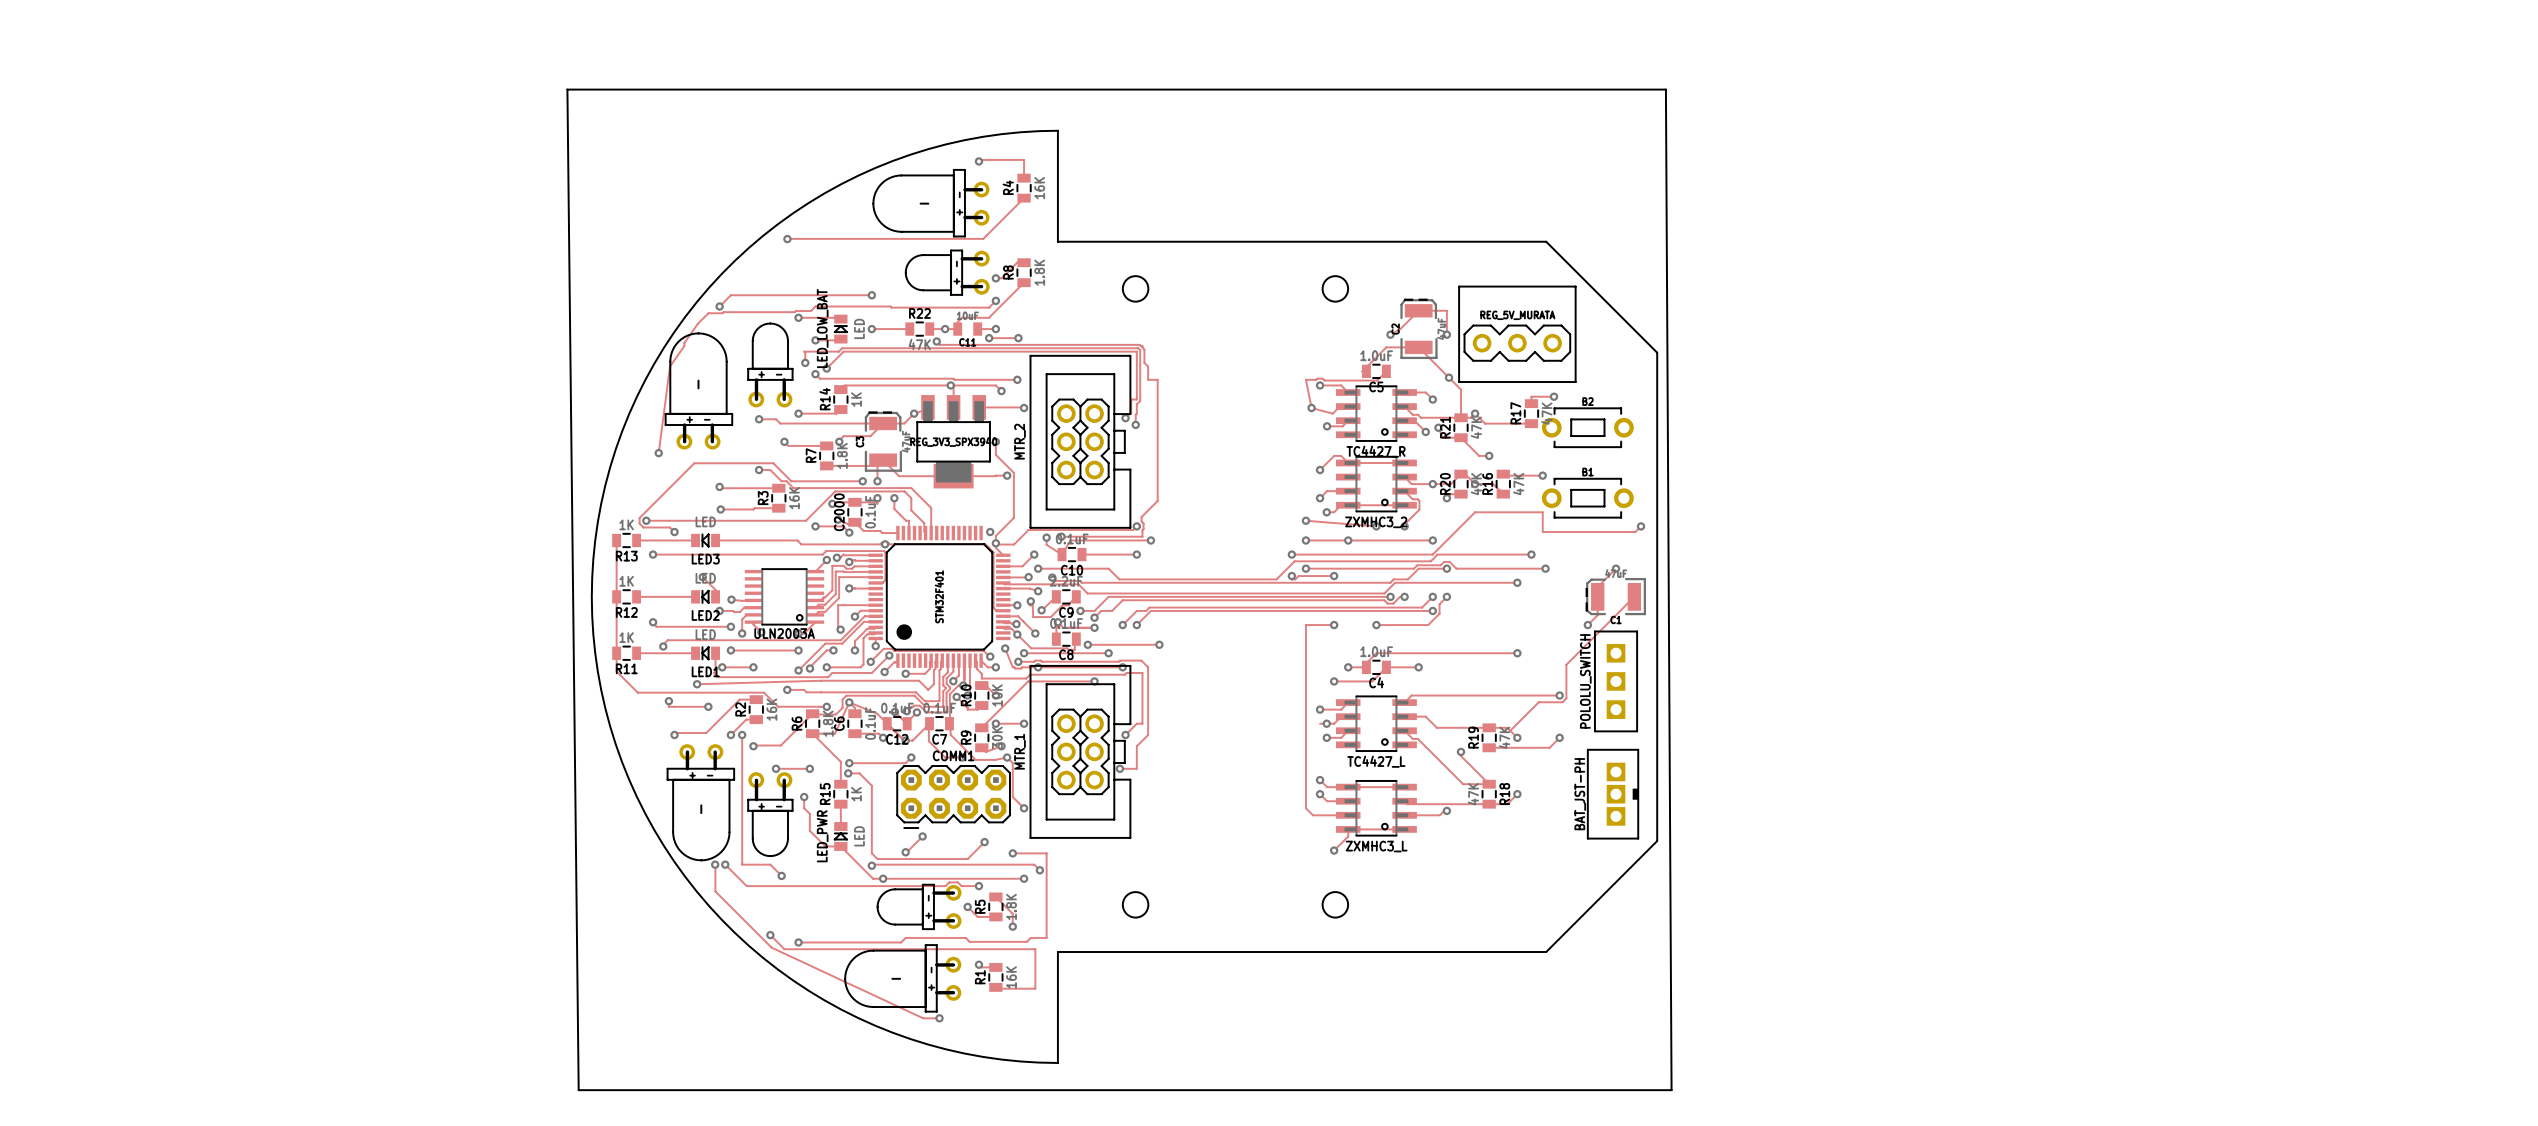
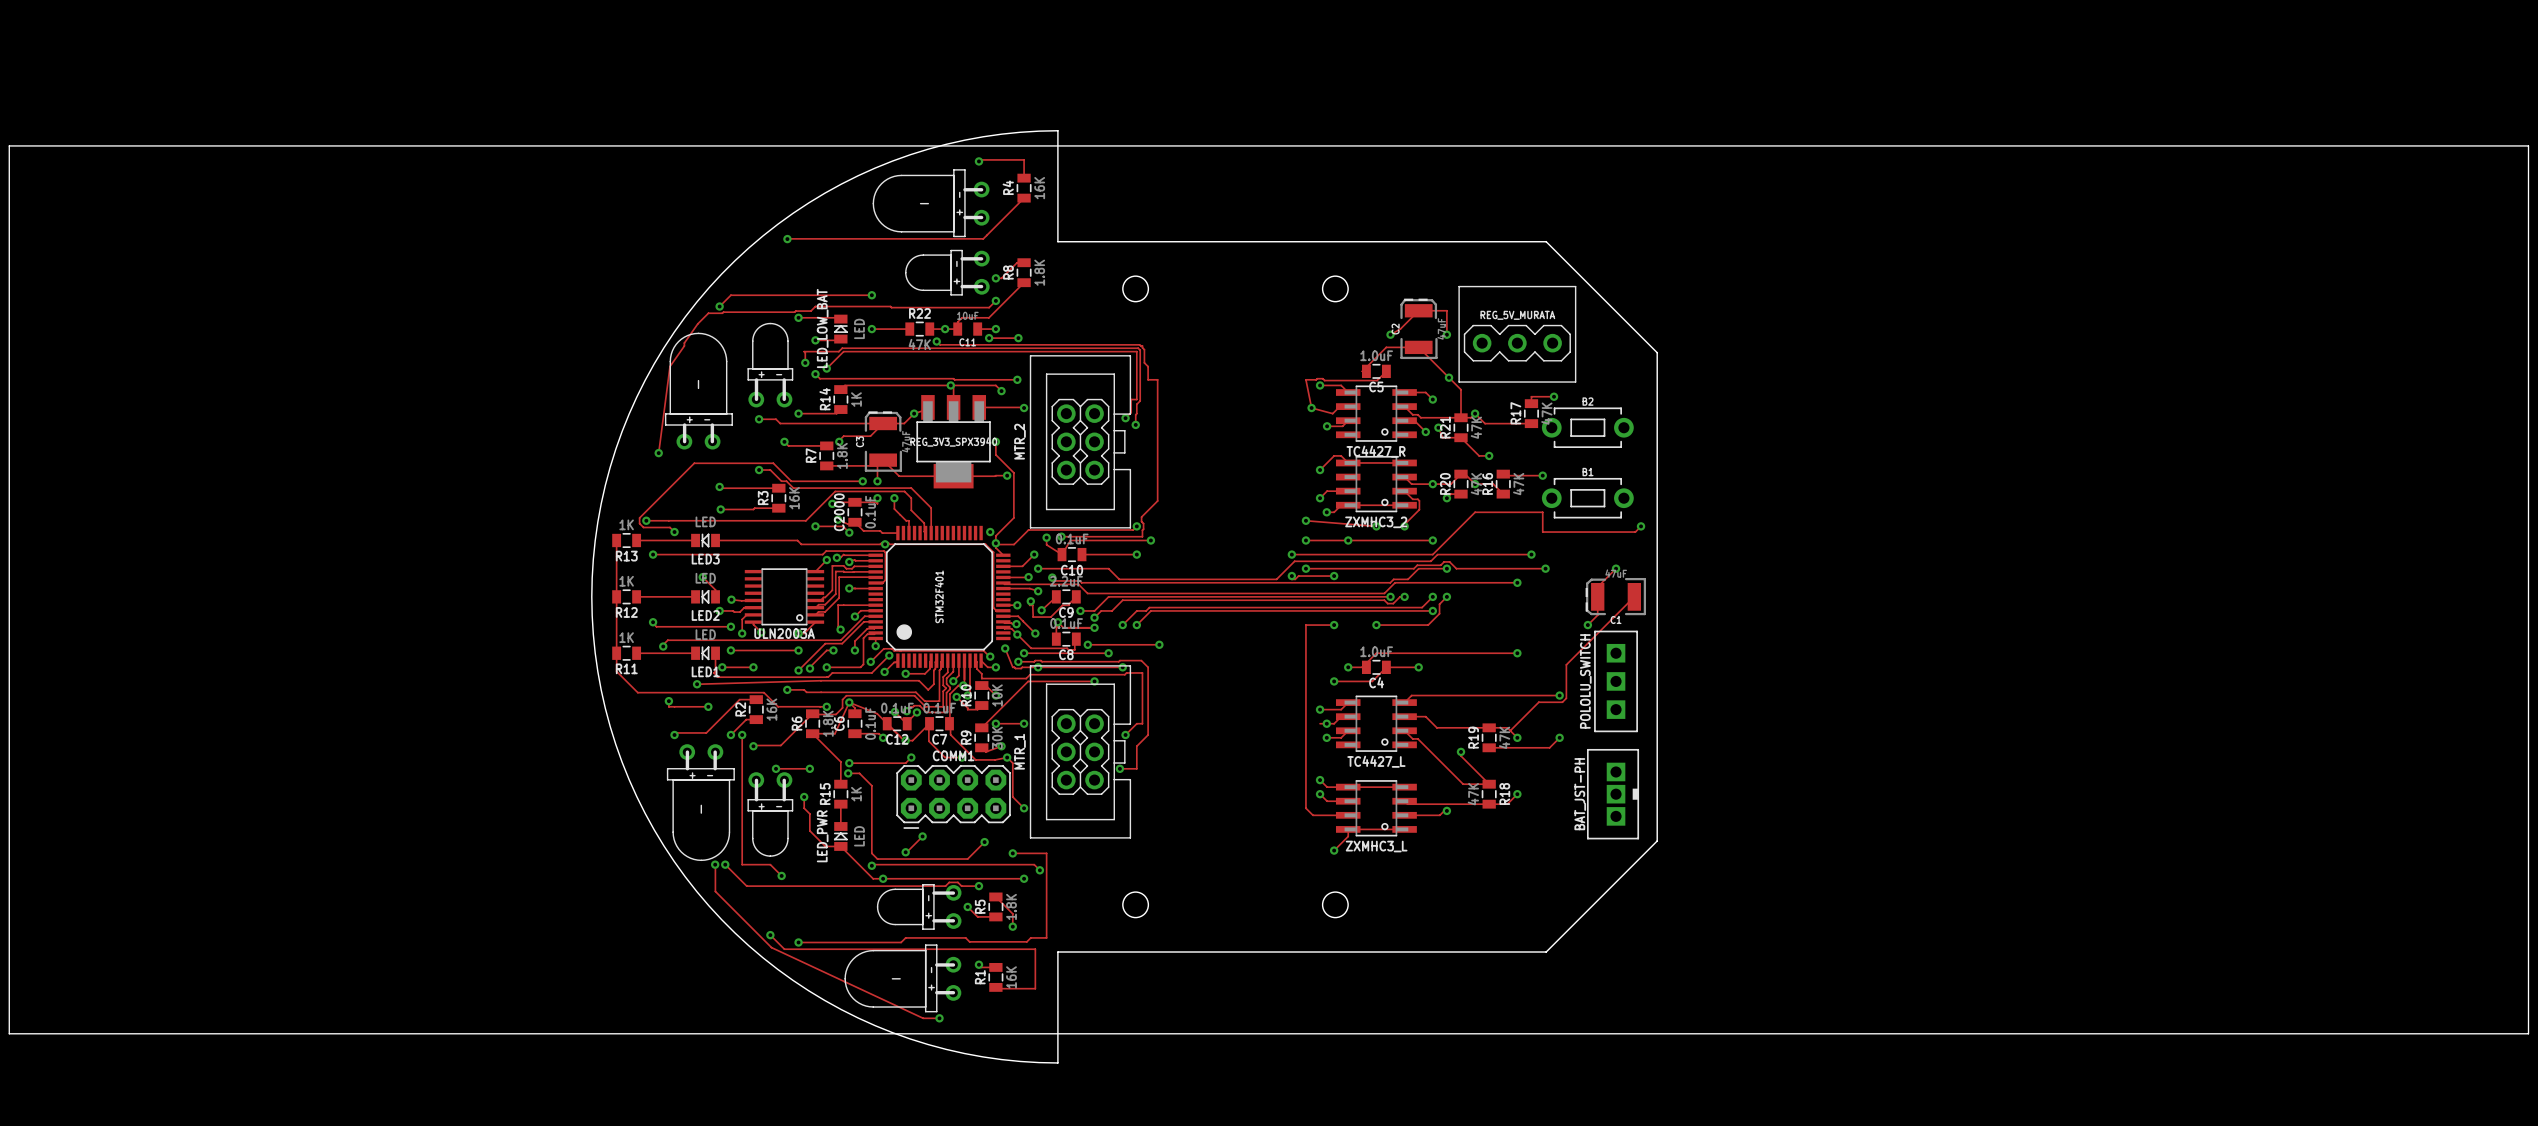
board edge: (567, 89) (1665, 89) (1671, 1090) (578, 1090) (567, 89) -> none
board edge: none -> (9, 145) (2528, 145) (2528, 1033) (9, 1033) (9, 145)

